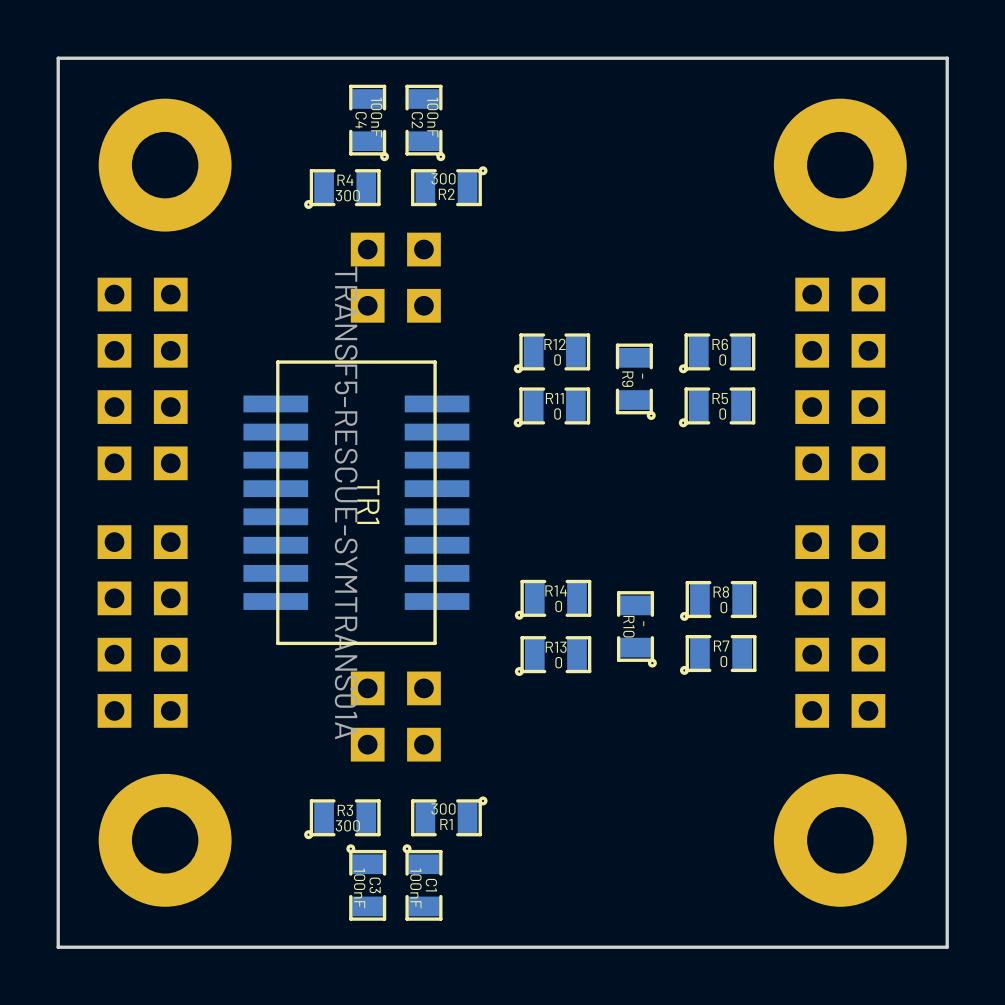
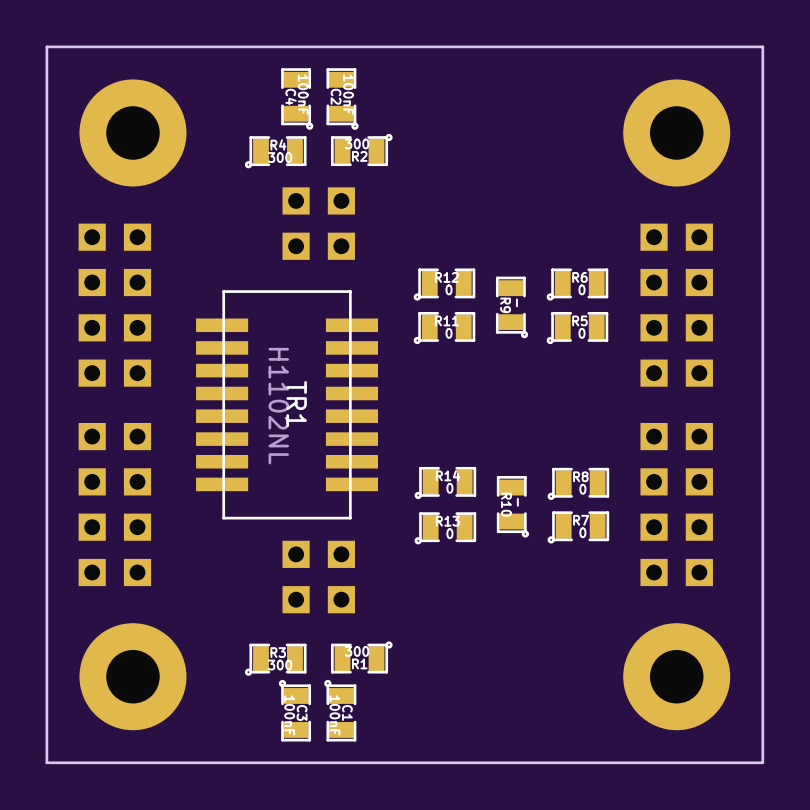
TR1 value: TRANSF5-RESCUE-SYMTRANS01A (346, 502) -> H1102NL (278, 406)

